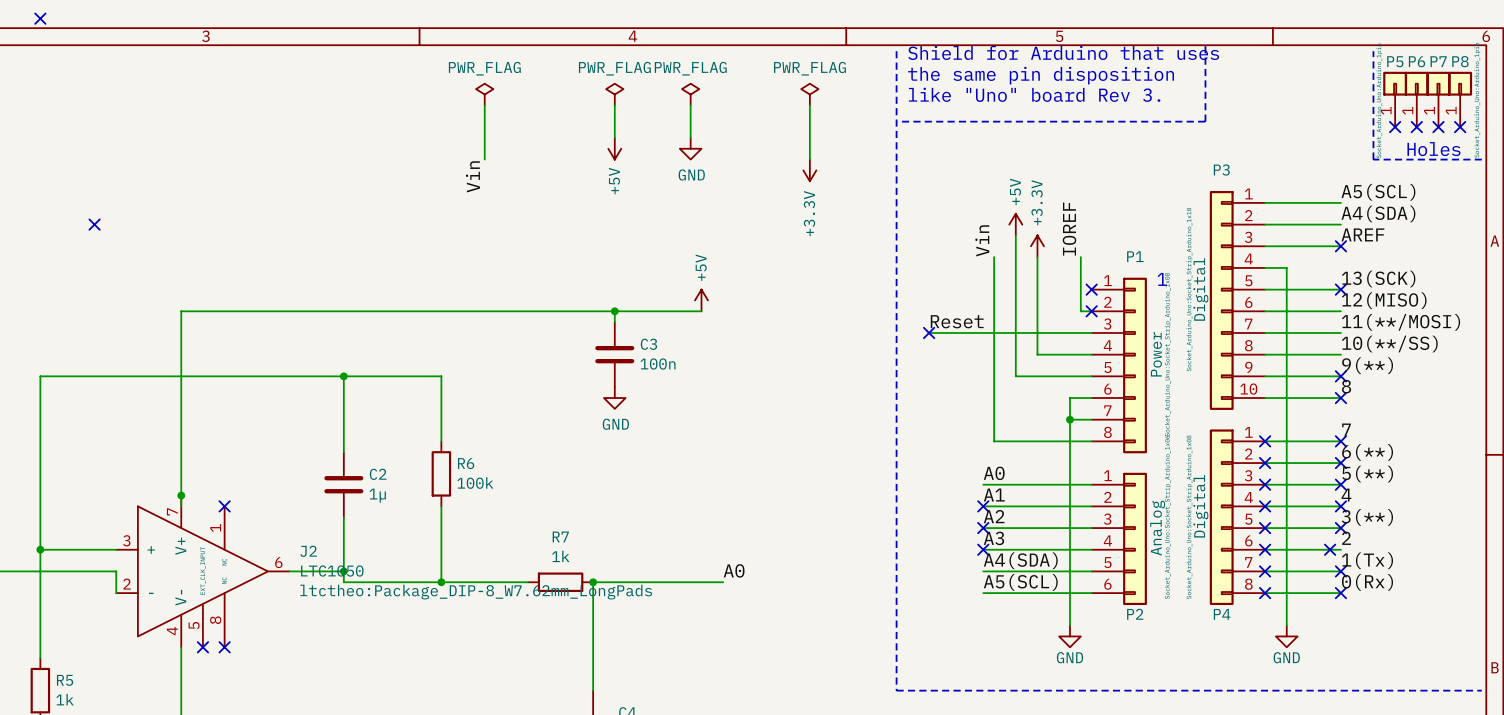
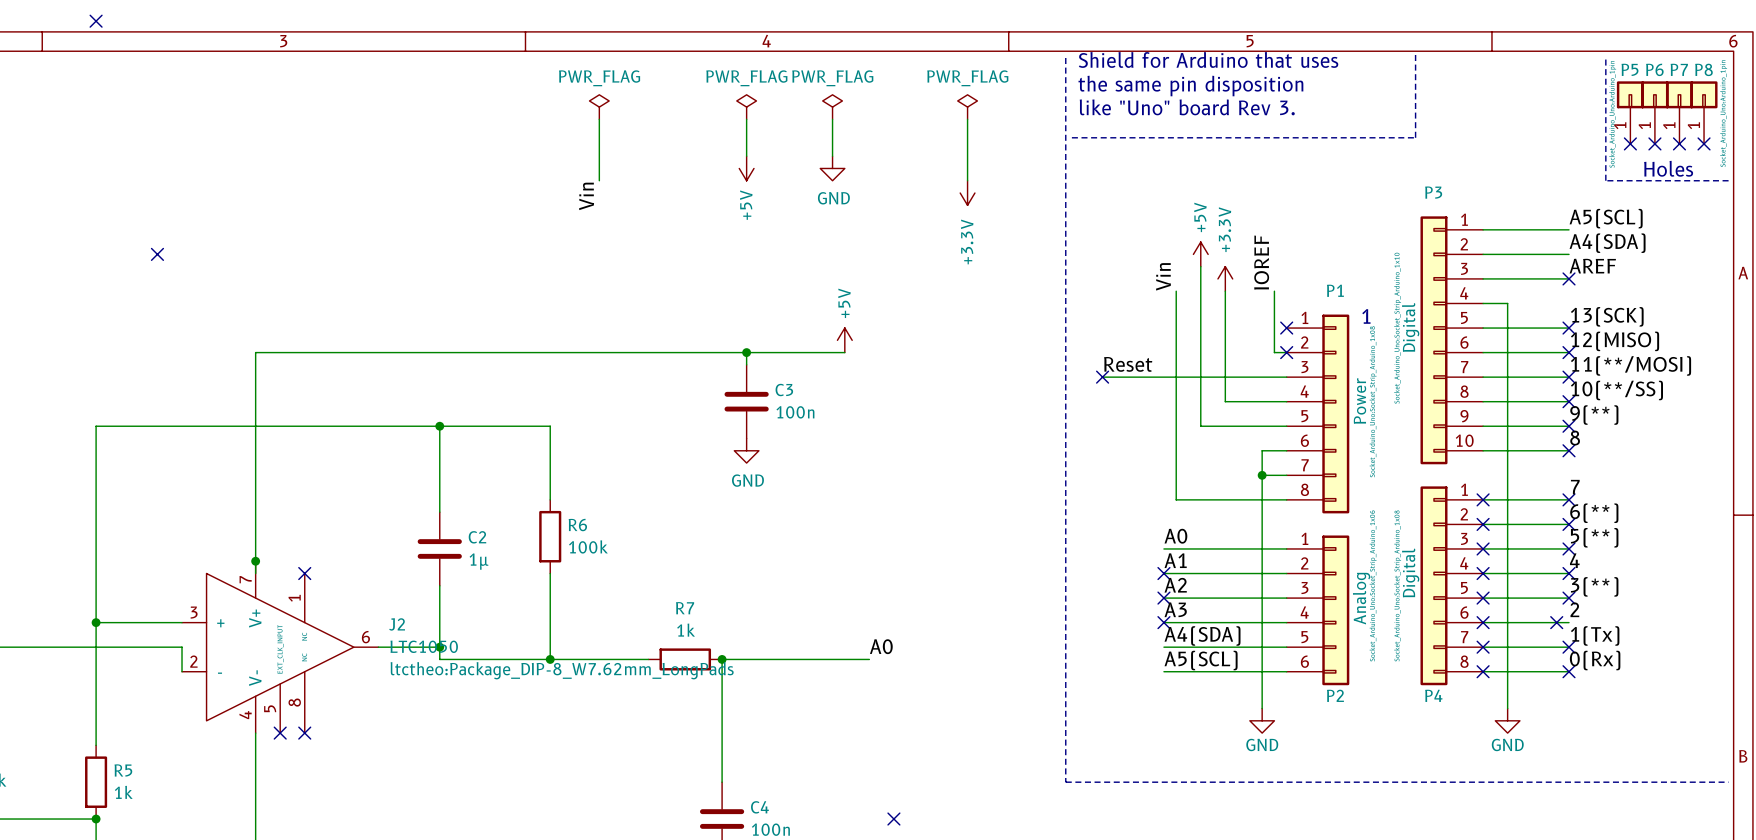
no-connect mark: none -> (1569, 352)
no-connect mark: none -> (1569, 377)
no-connect mark: none -> (1569, 401)

